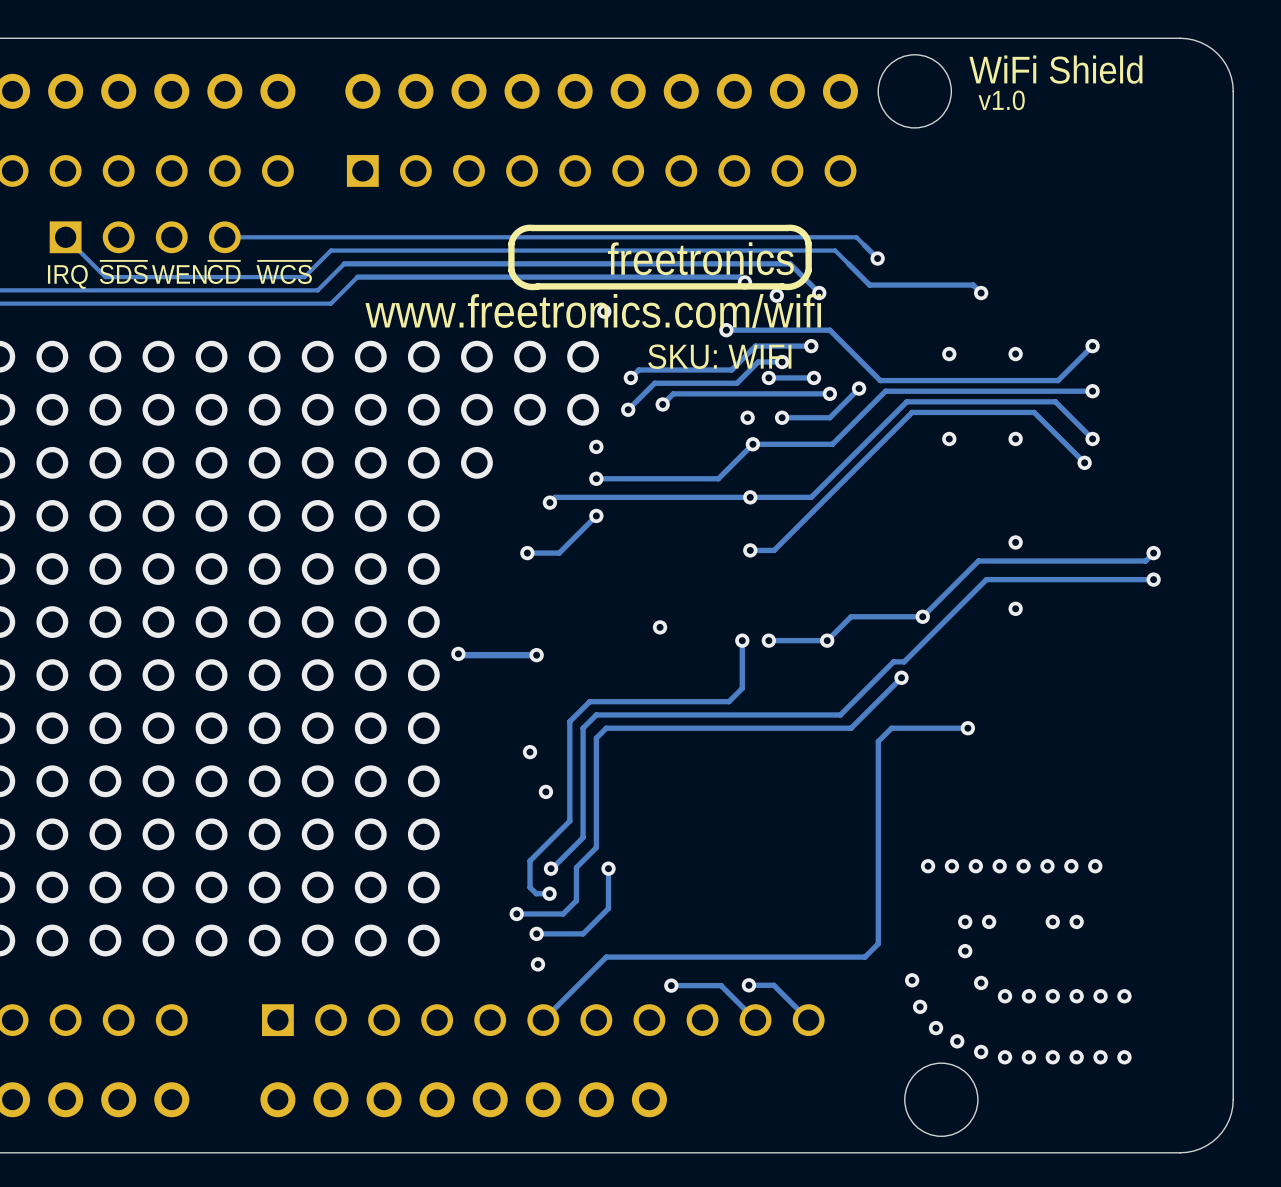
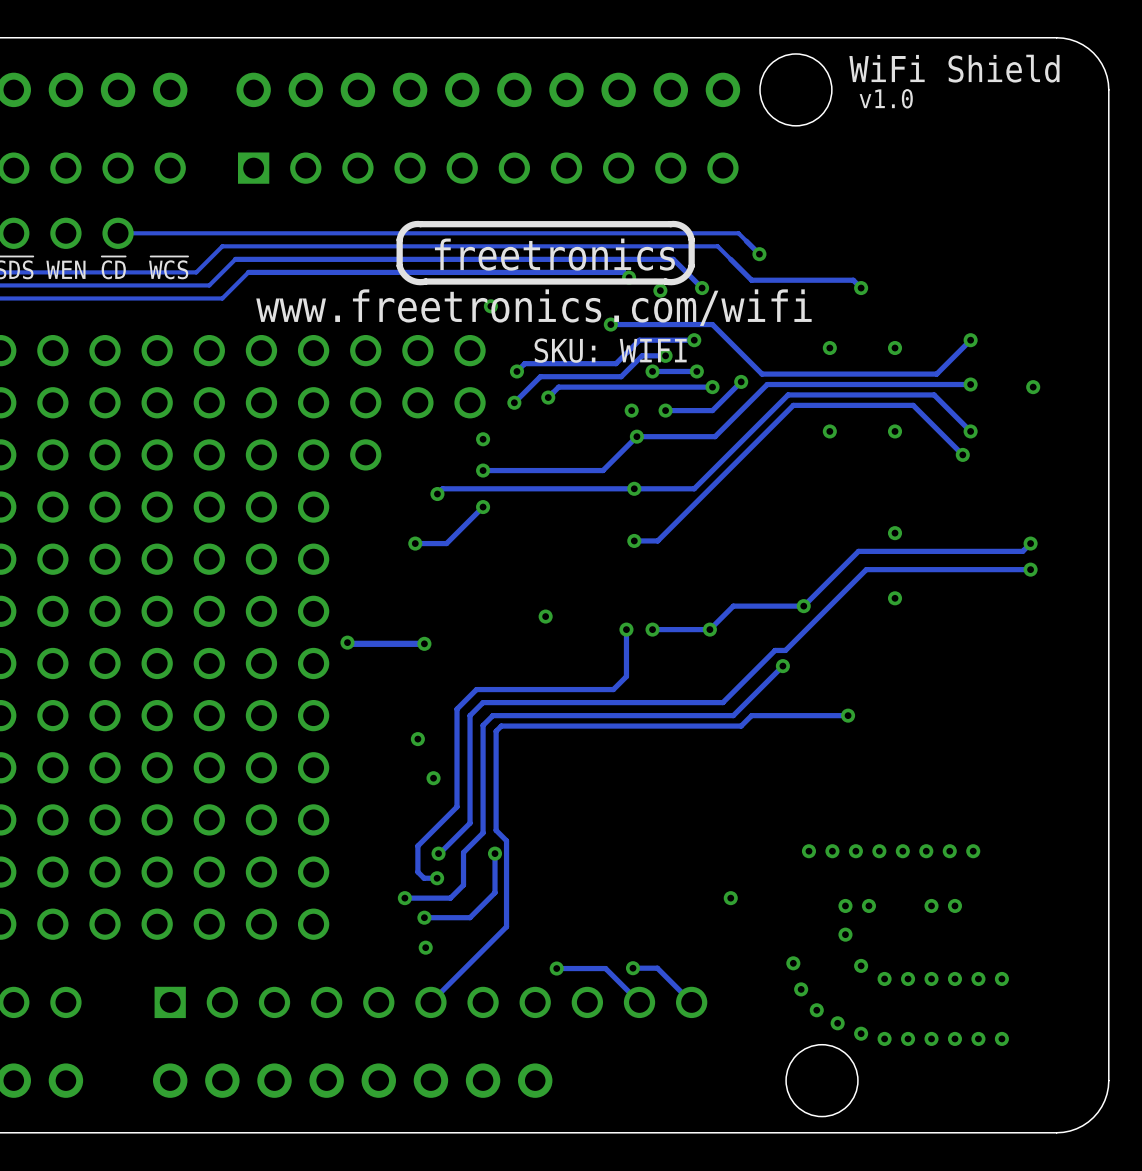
via: none -> (1033, 387)
track: (891, 728) (878, 741) (878, 943) (865, 957) (606, 957) -> (773, 715) (751, 715) (741, 726) (501, 726) (496, 731) (496, 830) (506, 840) (506, 926) (492, 940)
via: none -> (730, 898)

